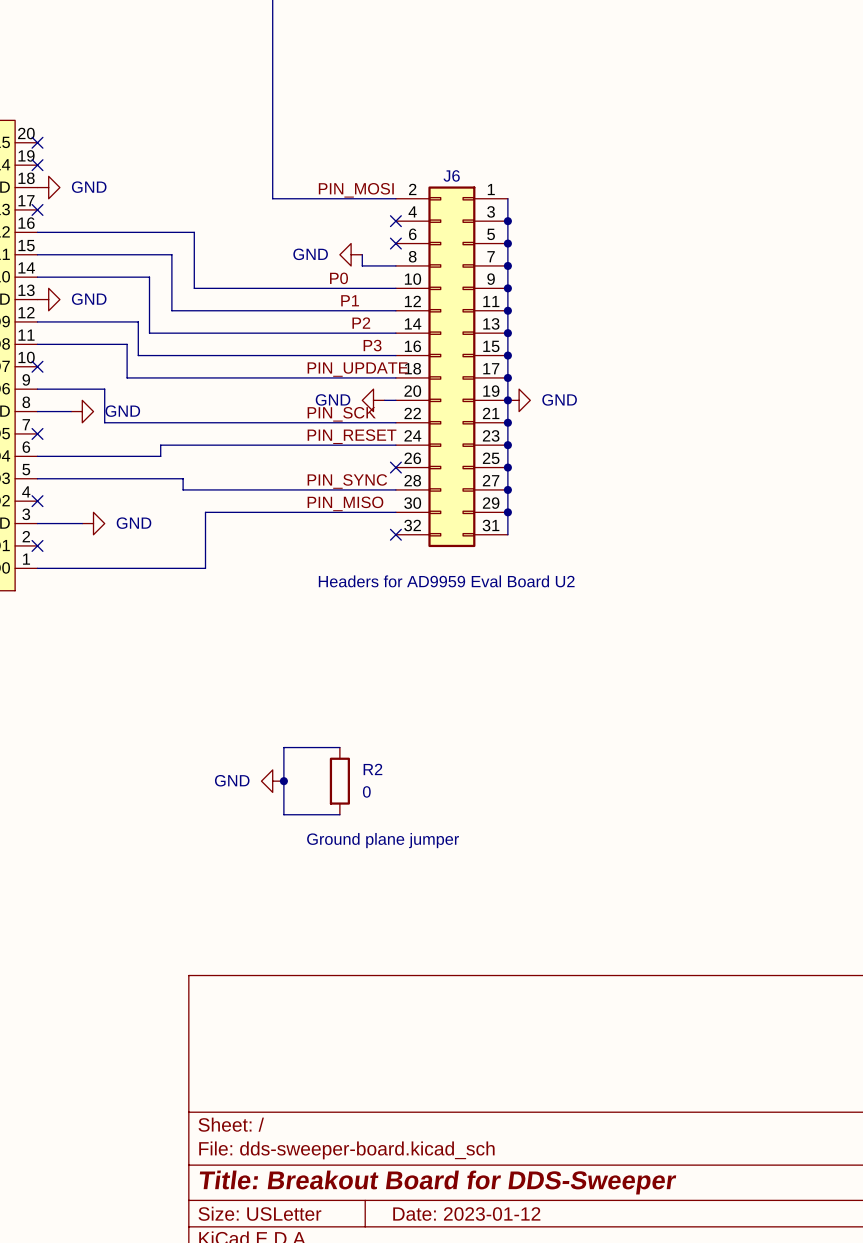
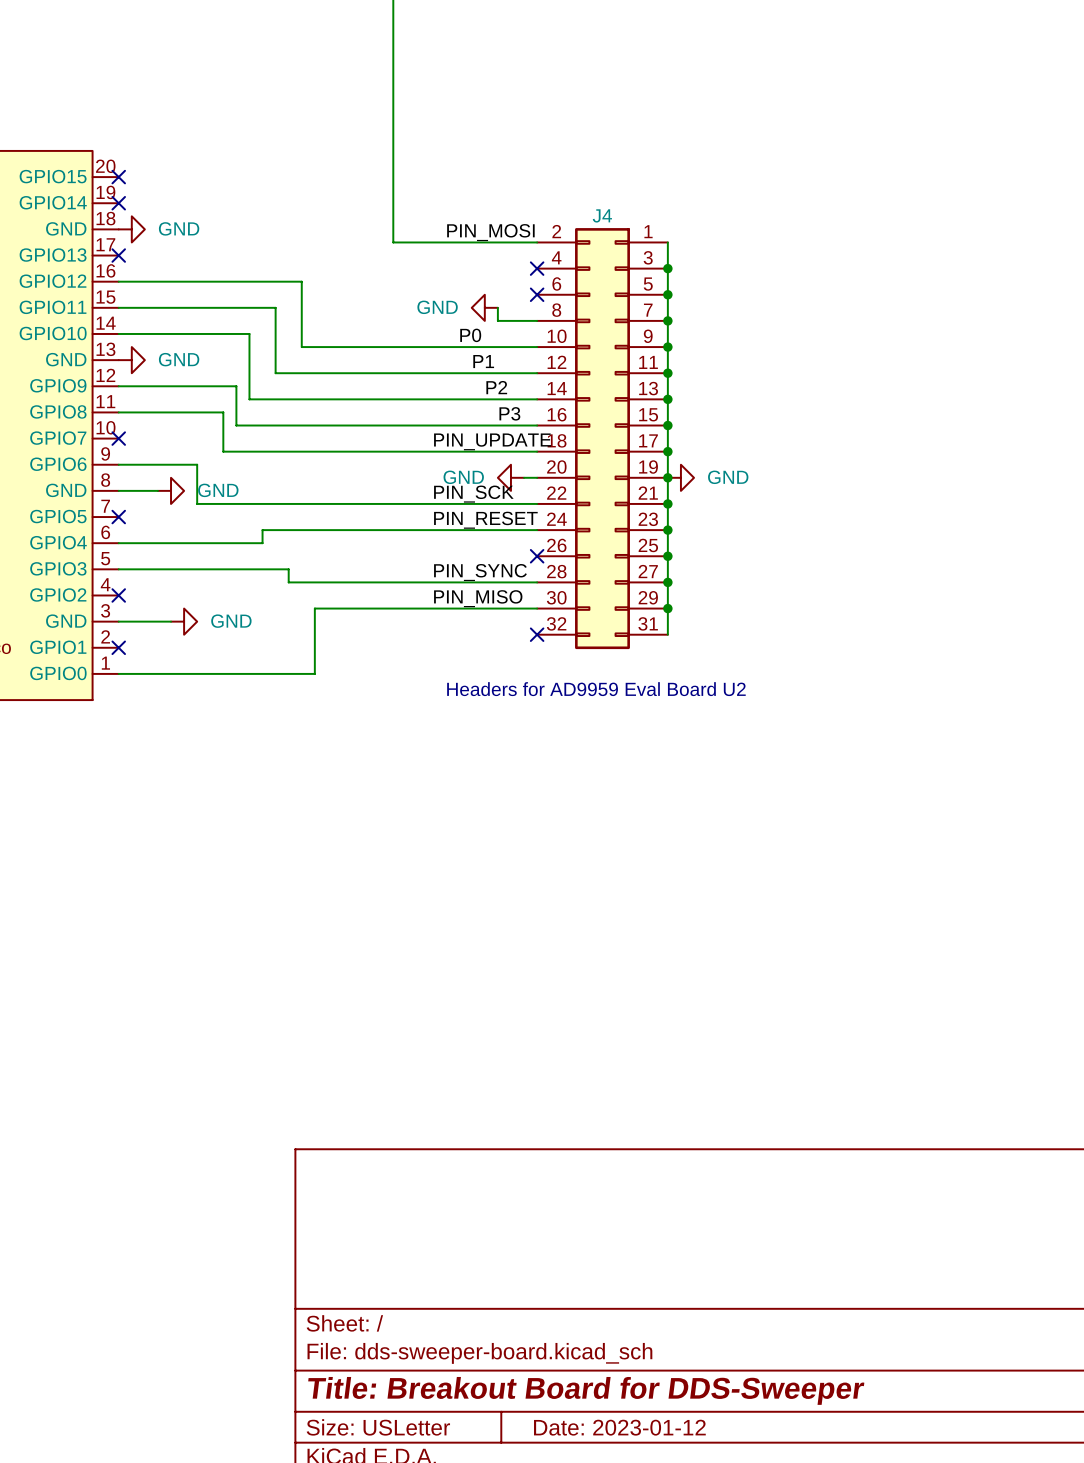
J6 name: J6 (451, 175) -> J4 (602, 215)
wire: (339, 747) (283, 747) (283, 814) (339, 814) -> none
power symbol: GND (272, 781) -> none
junction: (283, 781) -> none
R2: 0 (339, 781) -> none
text: Ground plane jumper (383, 840) -> none

